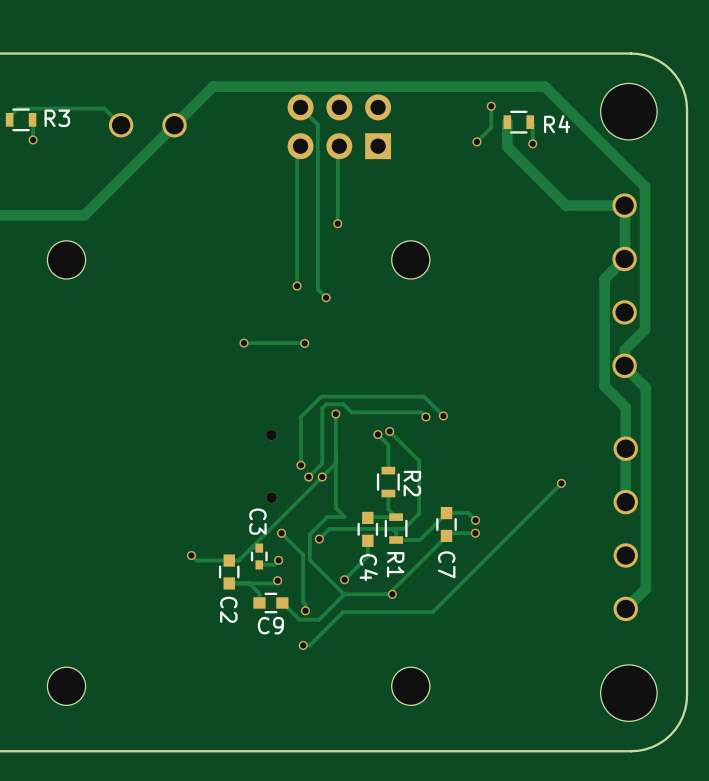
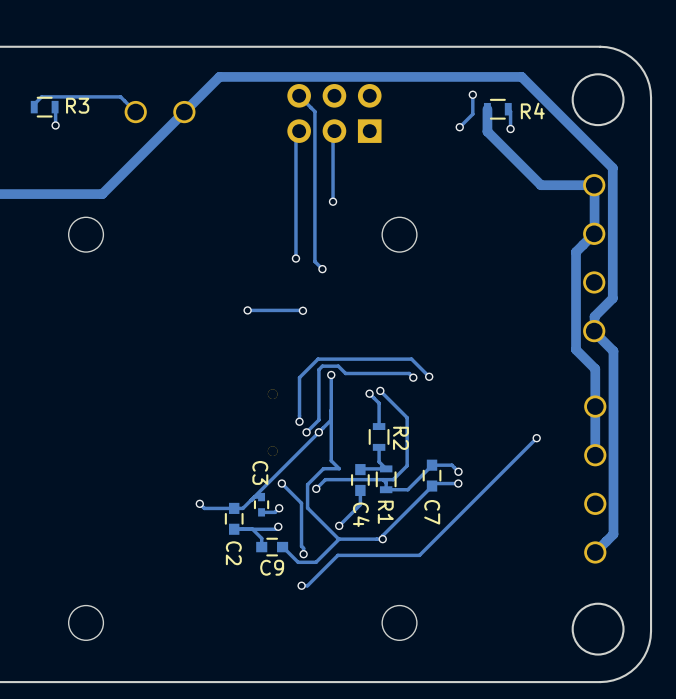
round board edge: none -> [571, 73, 625, 127]
part: (628, 111) -> none
round board edge: none -> [571, 602, 625, 656]
part: (628, 693) -> none

